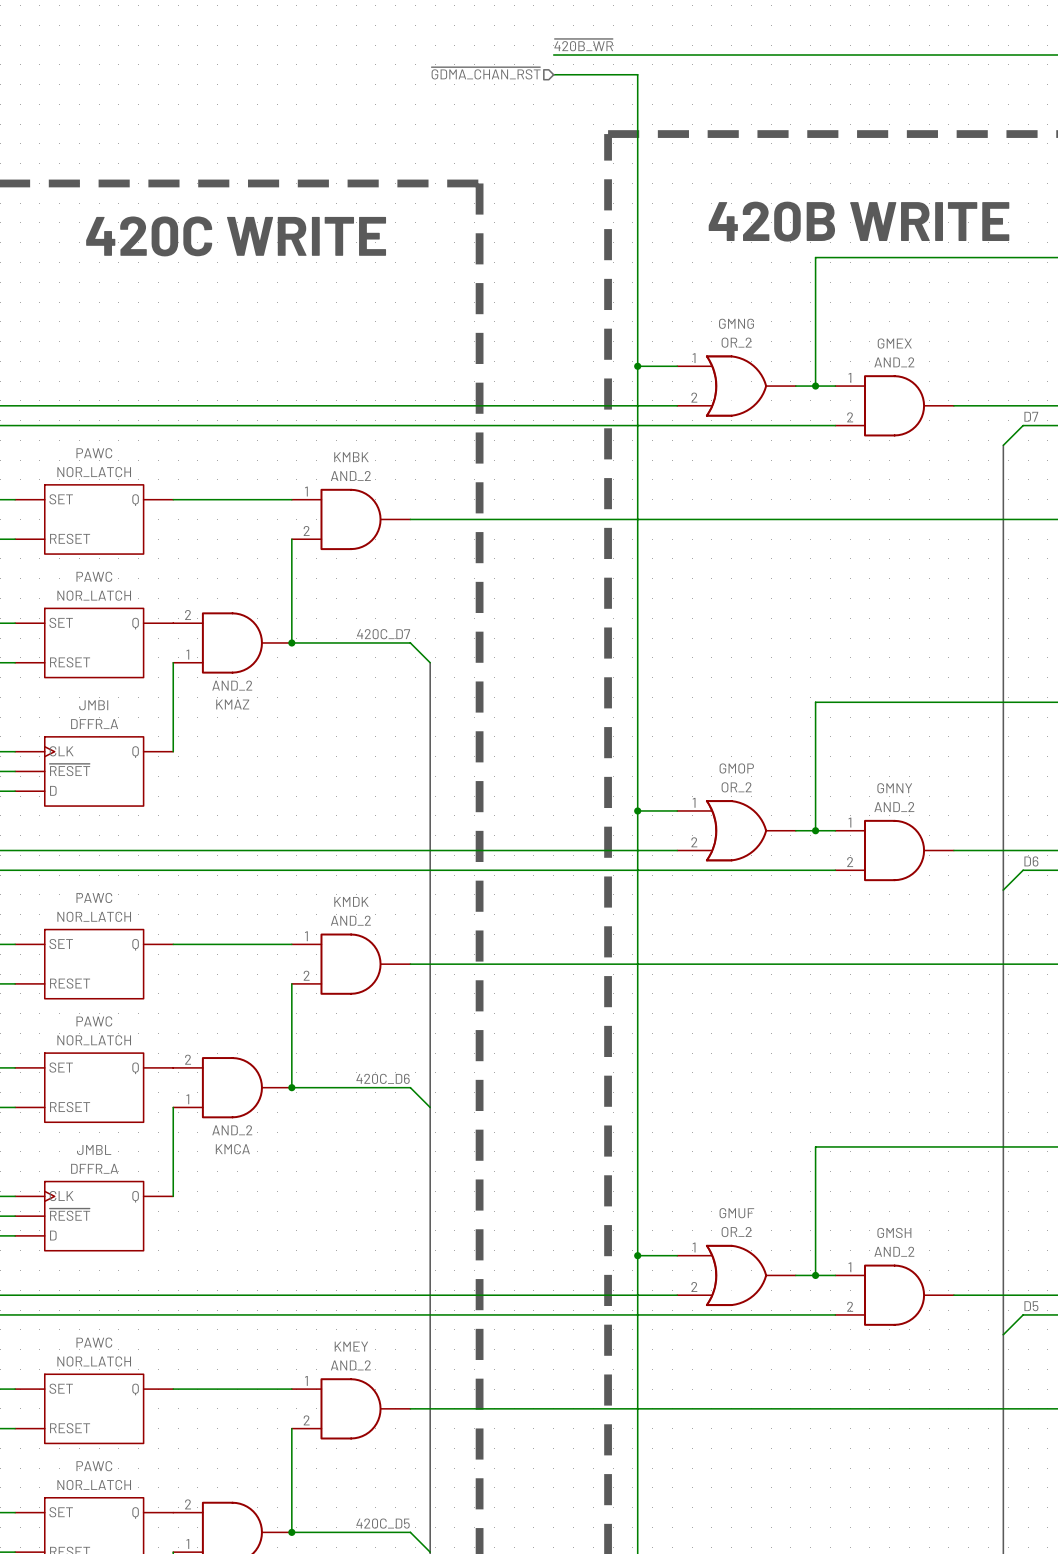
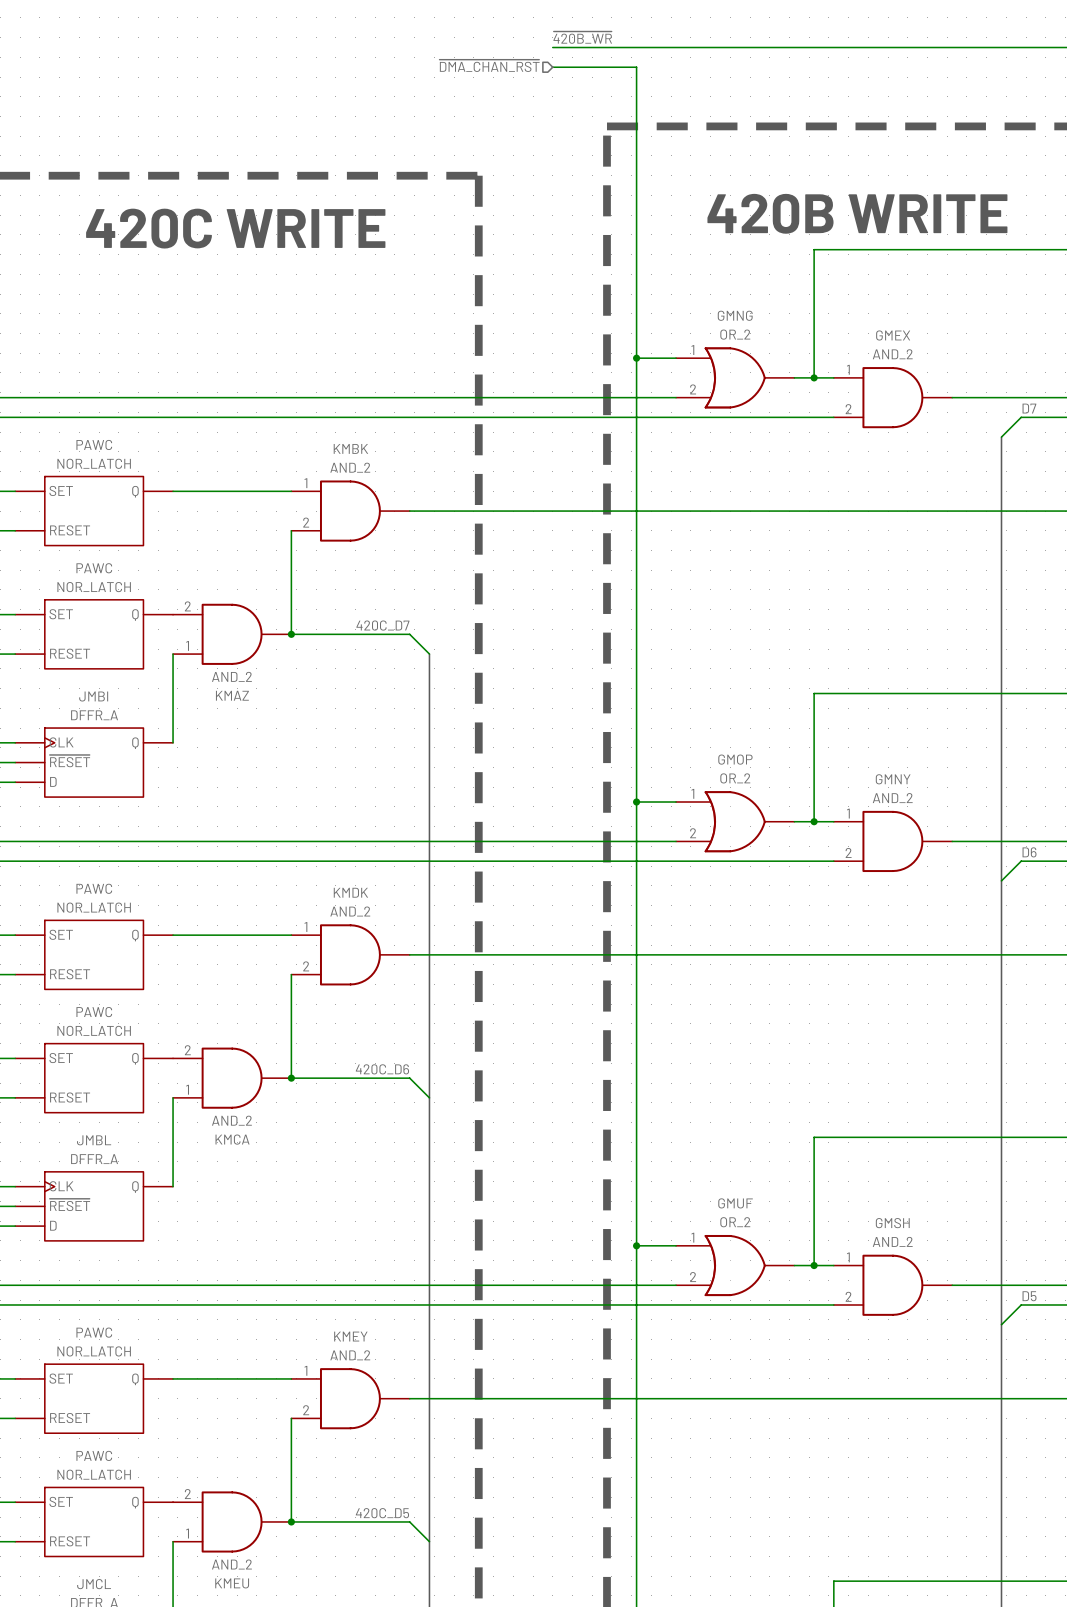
hierarchical label: ~{GDMA_CHAN_RST} (486, 73) -> ~{DMA_CHAN_RST} (489, 65)

